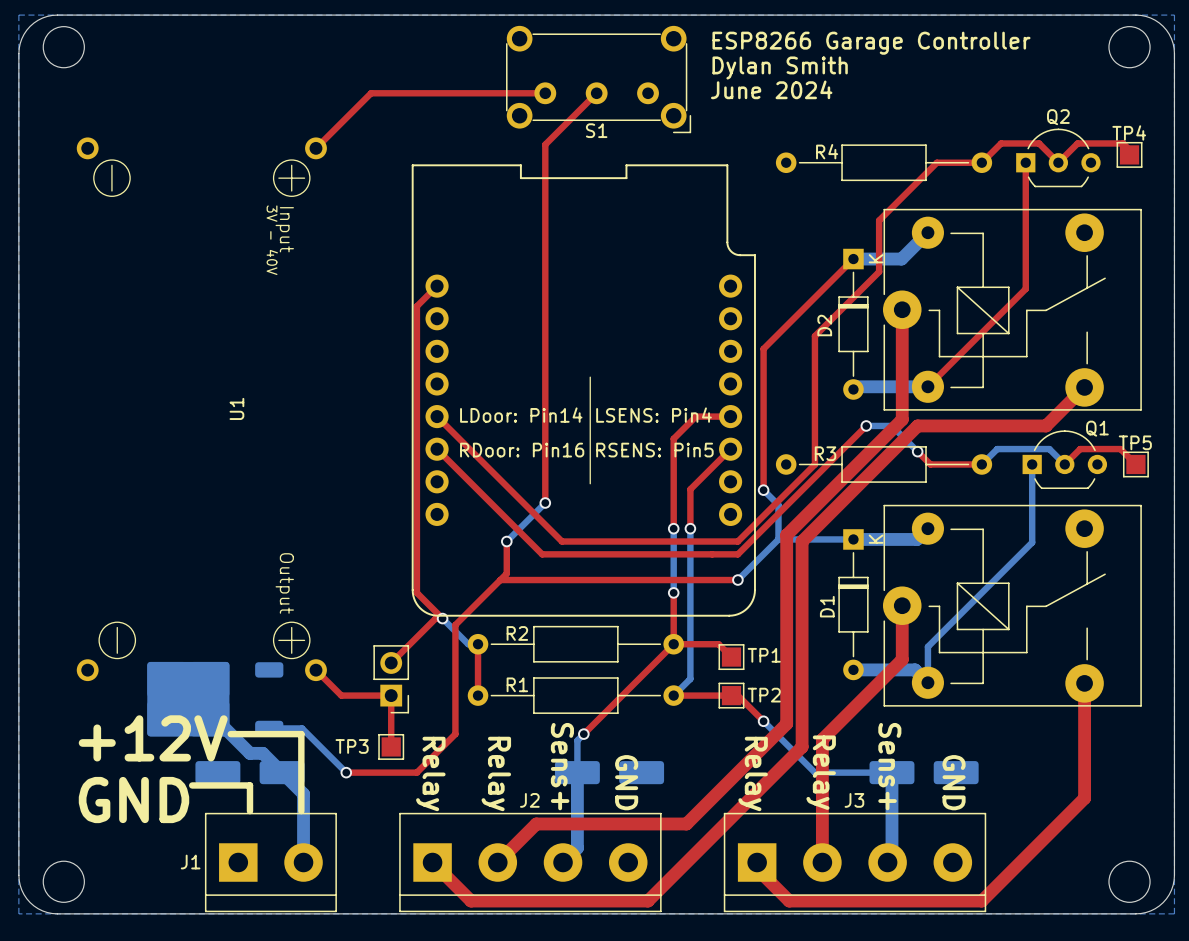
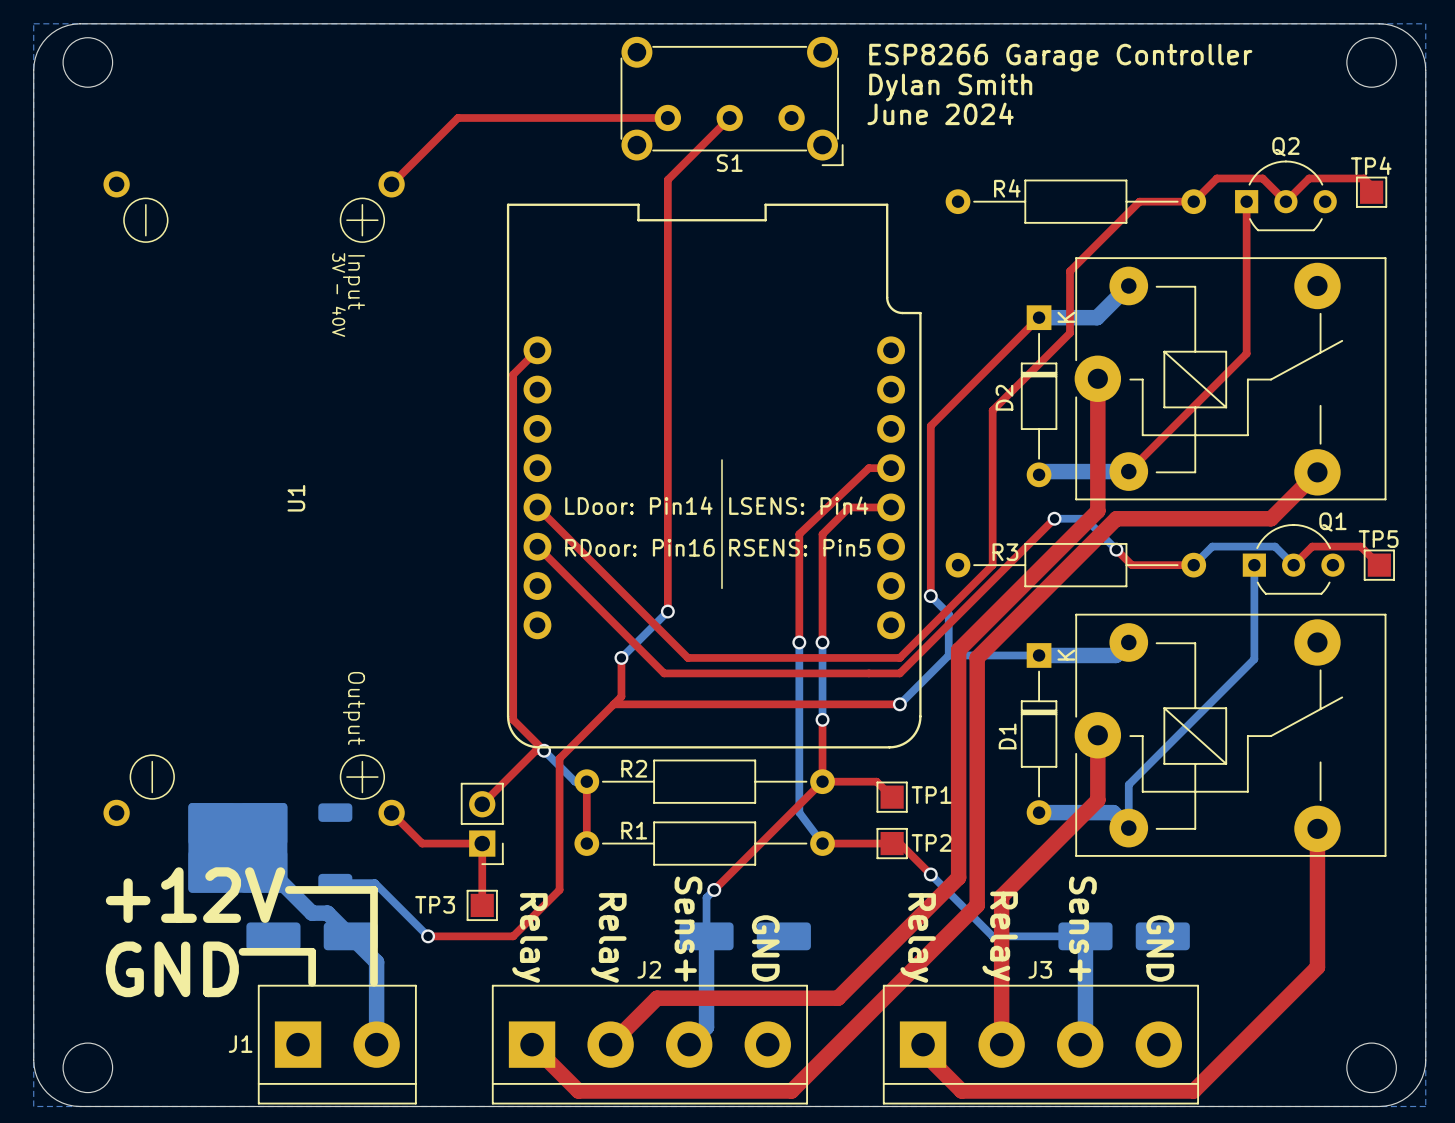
top track: none -> (891, 468) (868, 468) (799, 534) (799, 642)
top track: (730, 449) (690, 489) (690, 528) -> none
bottom track: (690, 528) (690, 678) (673, 695) -> (799, 642) (799, 812) (822, 843)
via position: (690, 528) -> (799, 642)

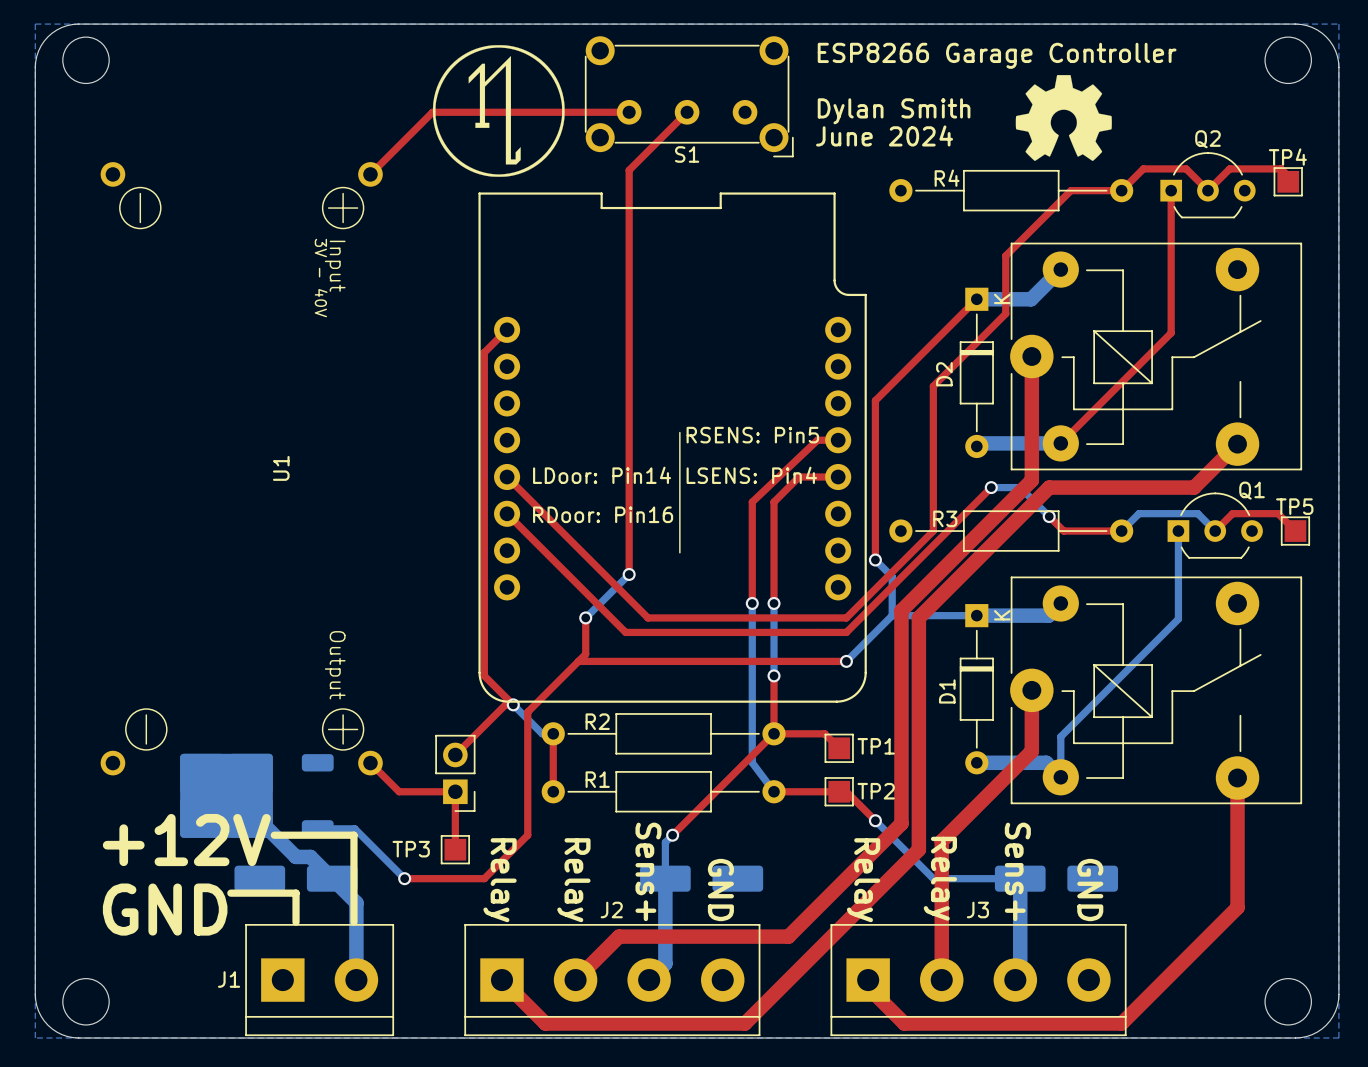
drawing: none -> [432, 45, 565, 177]
drawing: none -> [1015, 75, 1112, 162]
text: Dylan Smith (950, 87) -> none
text: June 2024 (940, 113) -> Dylan Smith (894, 111)
text: none -> June 2024 (884, 135)
text position: RSENS: Pin5 (799, 547) -> RSENS: Pin5 (752, 435)

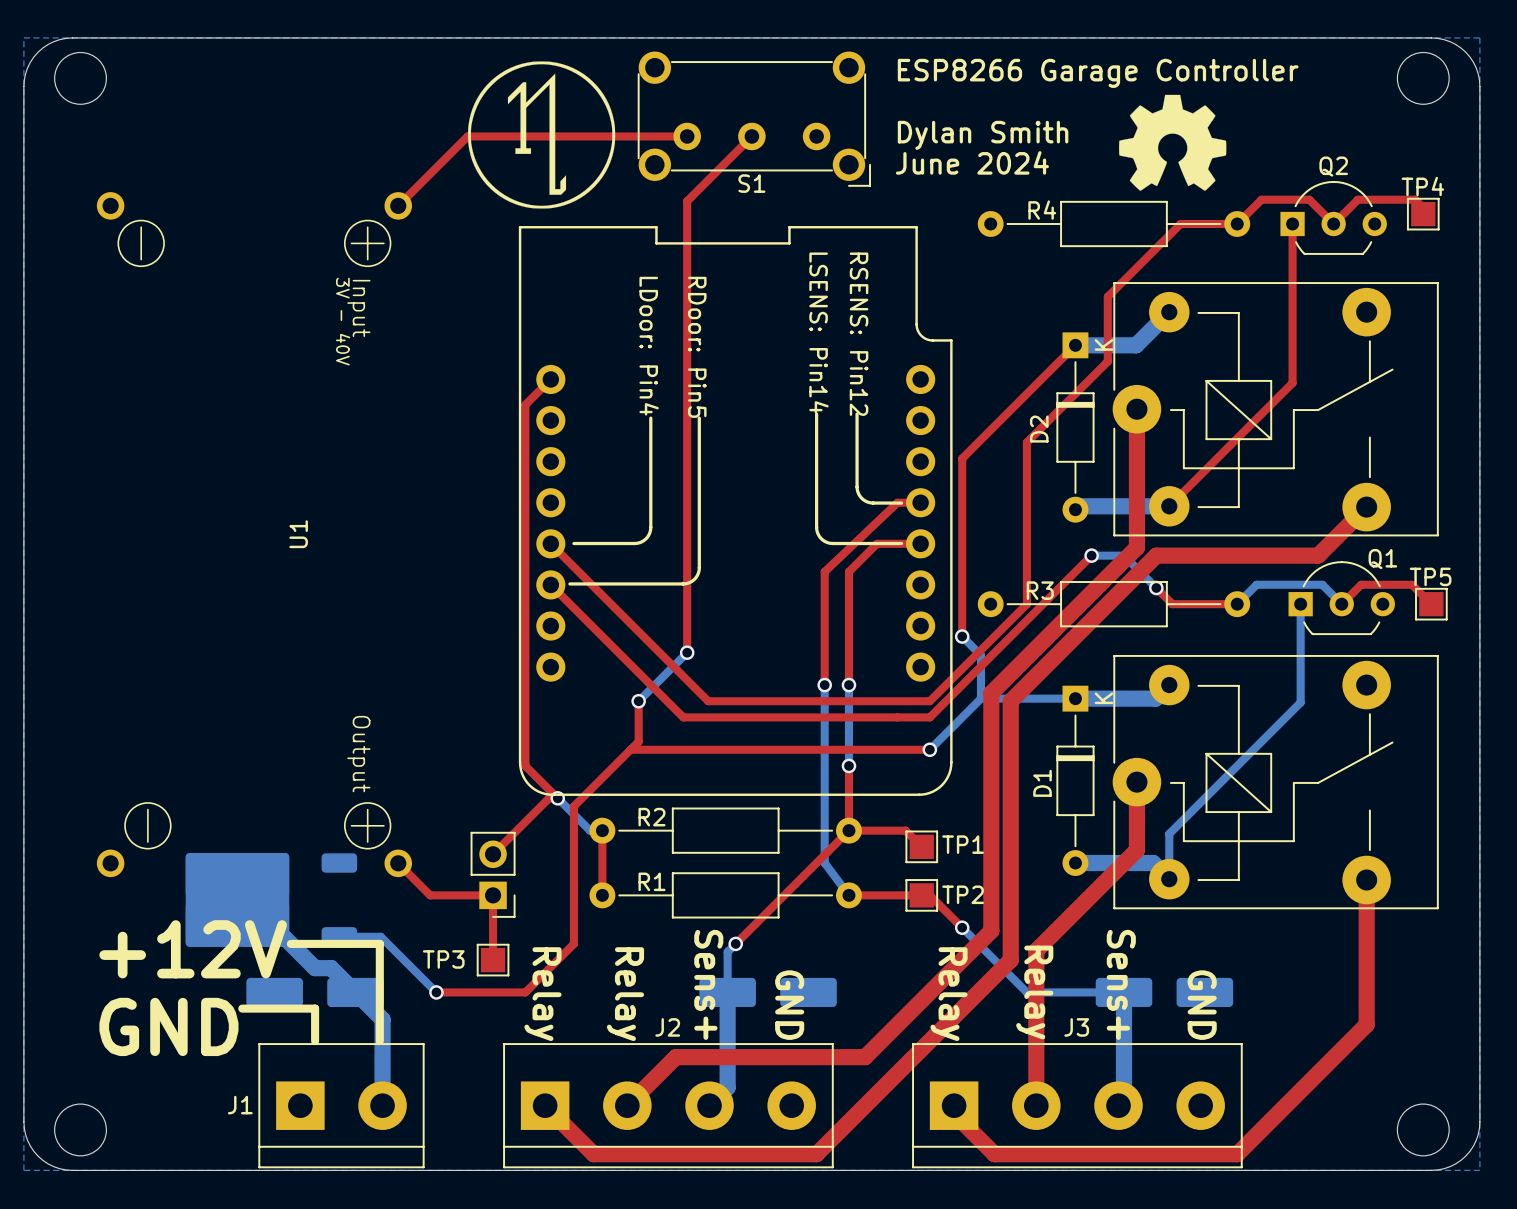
text: none -> LSENS: Pin14 (818, 333)
text: none -> RSENS: Pin12 (859, 334)
text: none -> LDoor: Pin4 (649, 346)
text: none -> RDoor: Pin5 (697, 347)
line: none -> (816, 414) (816, 527) (819, 535) (824, 541) (830, 543) (901, 543)
line: none -> (857, 414) (858, 493) (863, 499) (869, 502) (901, 503)
line: none -> (650, 418) (650, 527) (648, 535) (643, 541) (636, 543) (573, 543)
line: none -> (699, 418) (699, 567) (695, 577) (690, 582) (683, 583) (569, 583)
line: (679, 432) (679, 552) -> none
text: RSENS: Pin5 (752, 435) -> none
text: LDoor: Pin14 (602, 475) -> none
text: LSENS: Pin4 (751, 475) -> none
text: RDoor: Pin16 (603, 514) -> none

